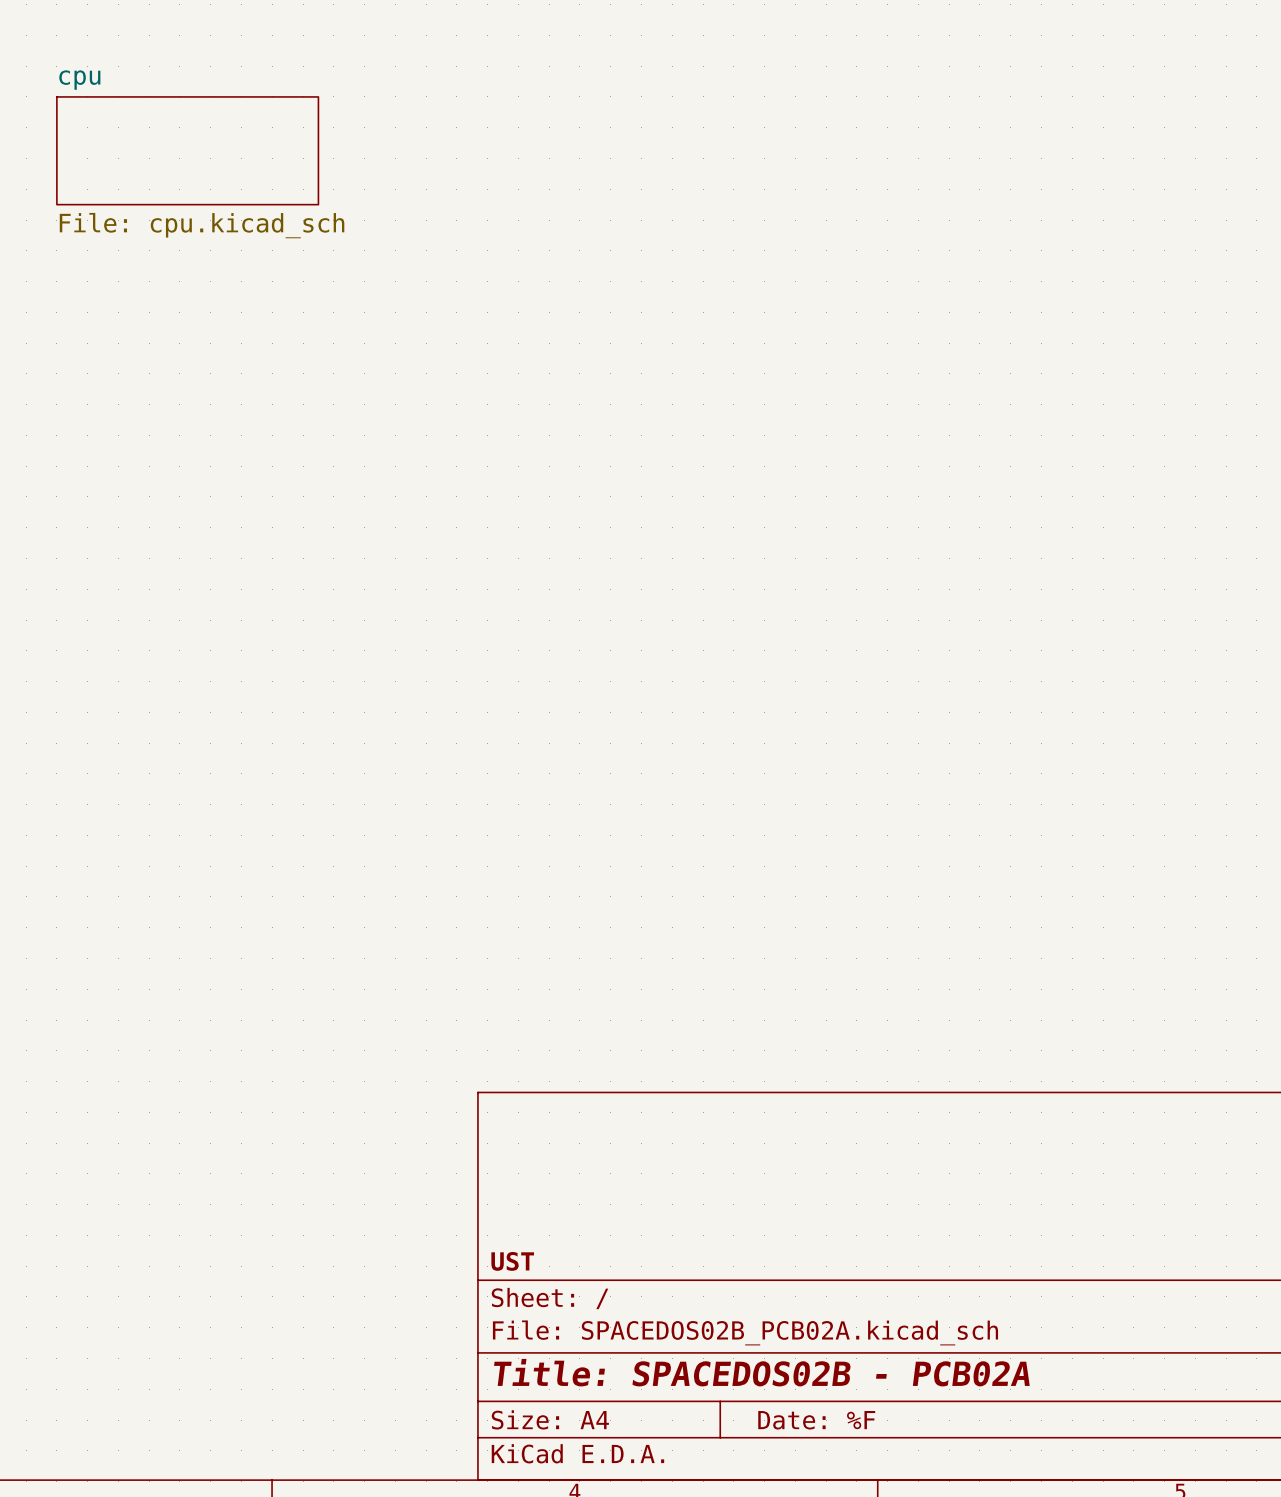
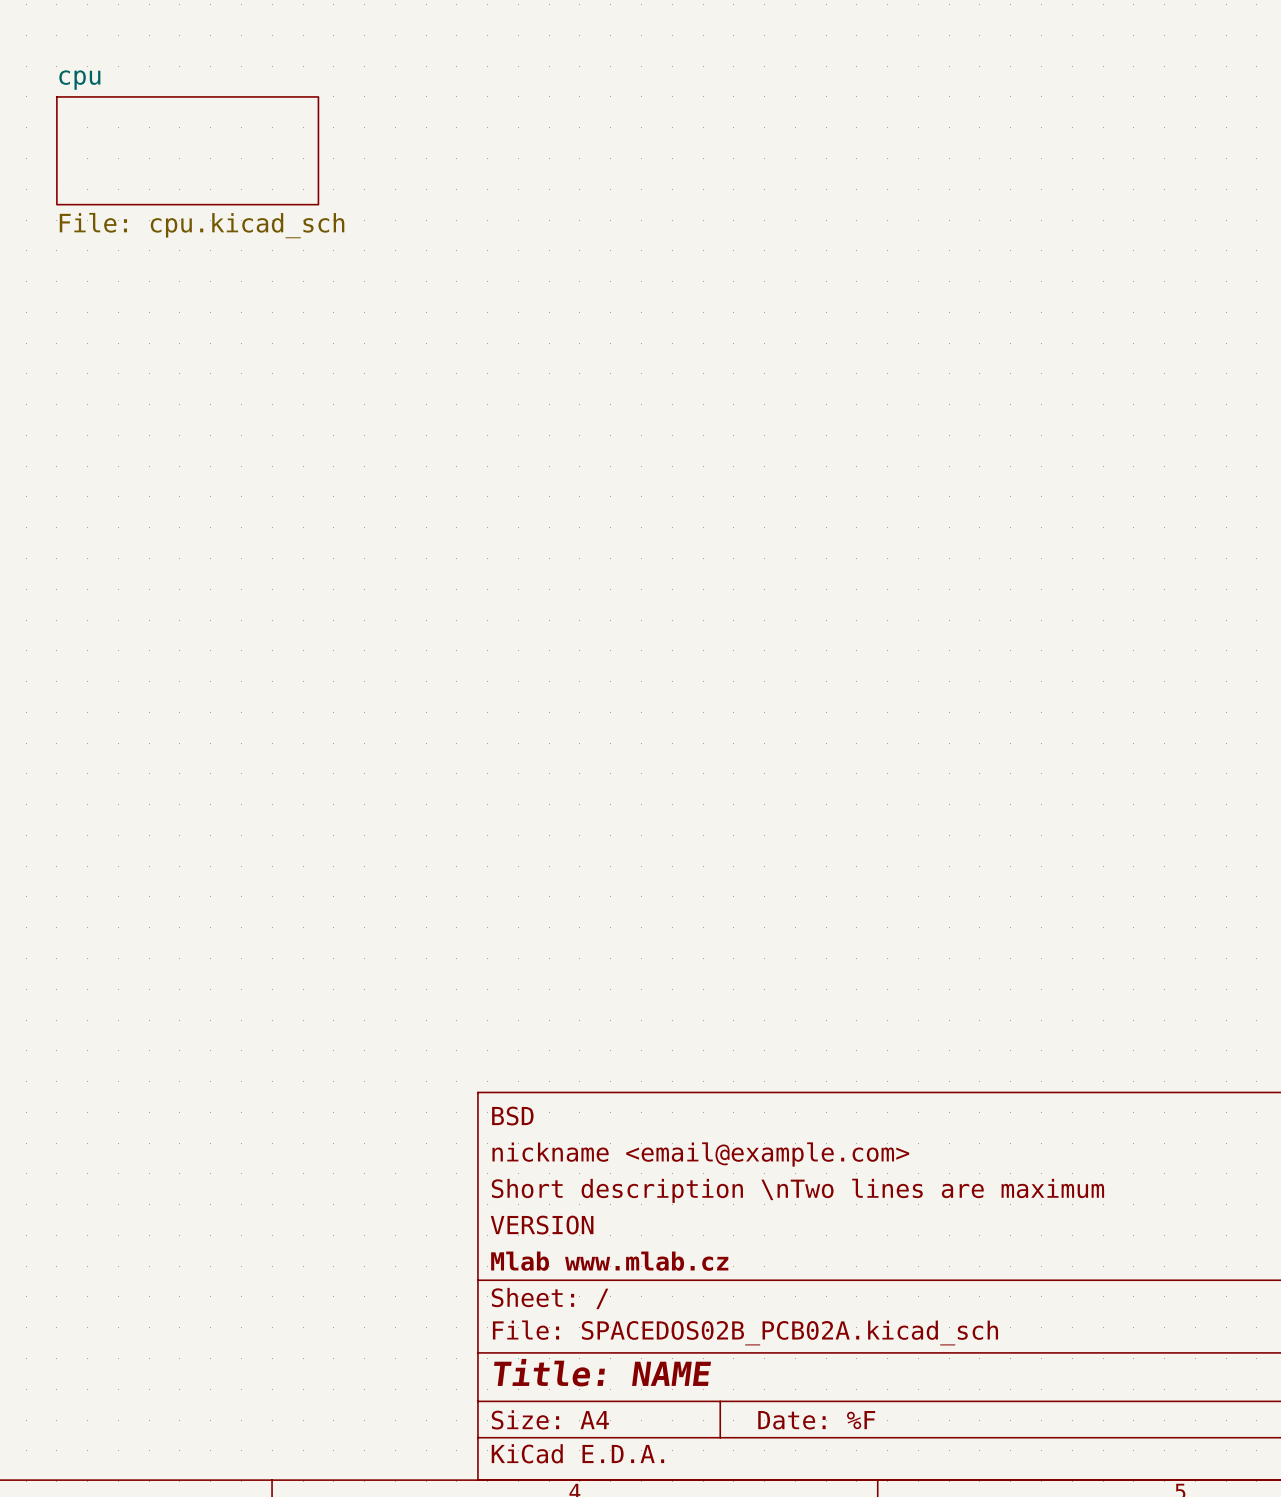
title block: none -> BSD (512, 1116)
title block: none -> nickname <email@example.com> (700, 1154)
title block: none -> Short description \nTwo lines are maximum (797, 1190)
title block: none -> VERSION (542, 1225)
title block: UST (512, 1261) -> Mlab www.mlab.cz (609, 1261)
title block: Title: SPACEDOS02B - PCB02A (761, 1372) -> Title: NAME (602, 1372)

